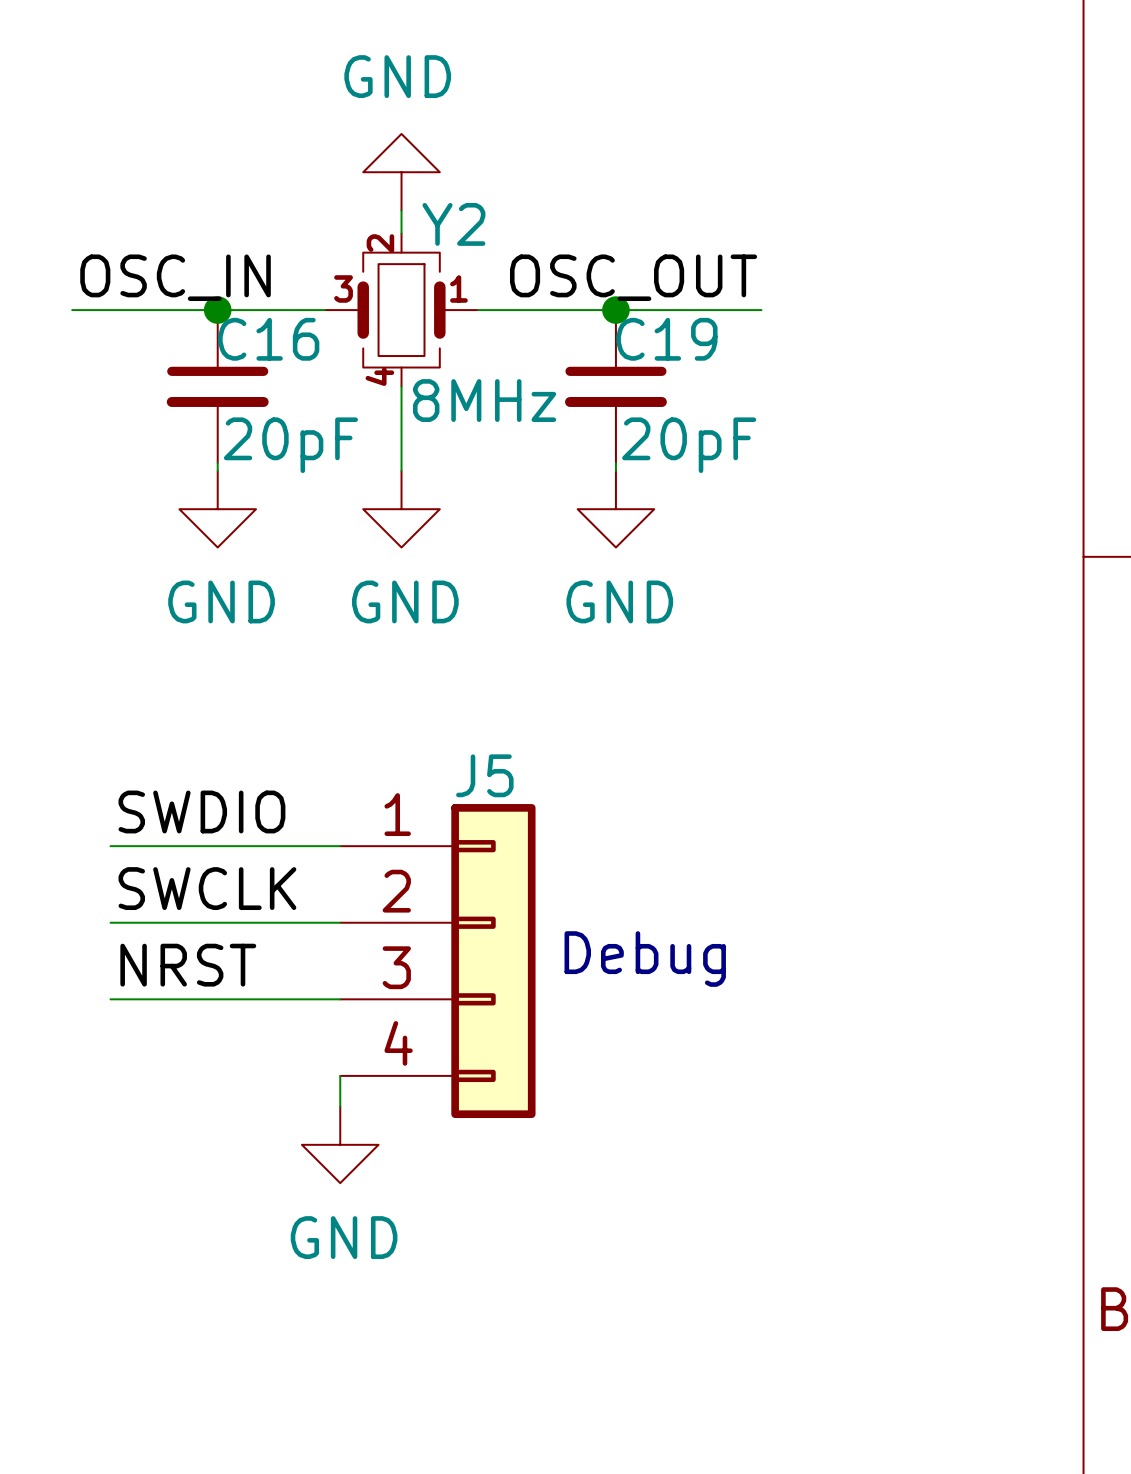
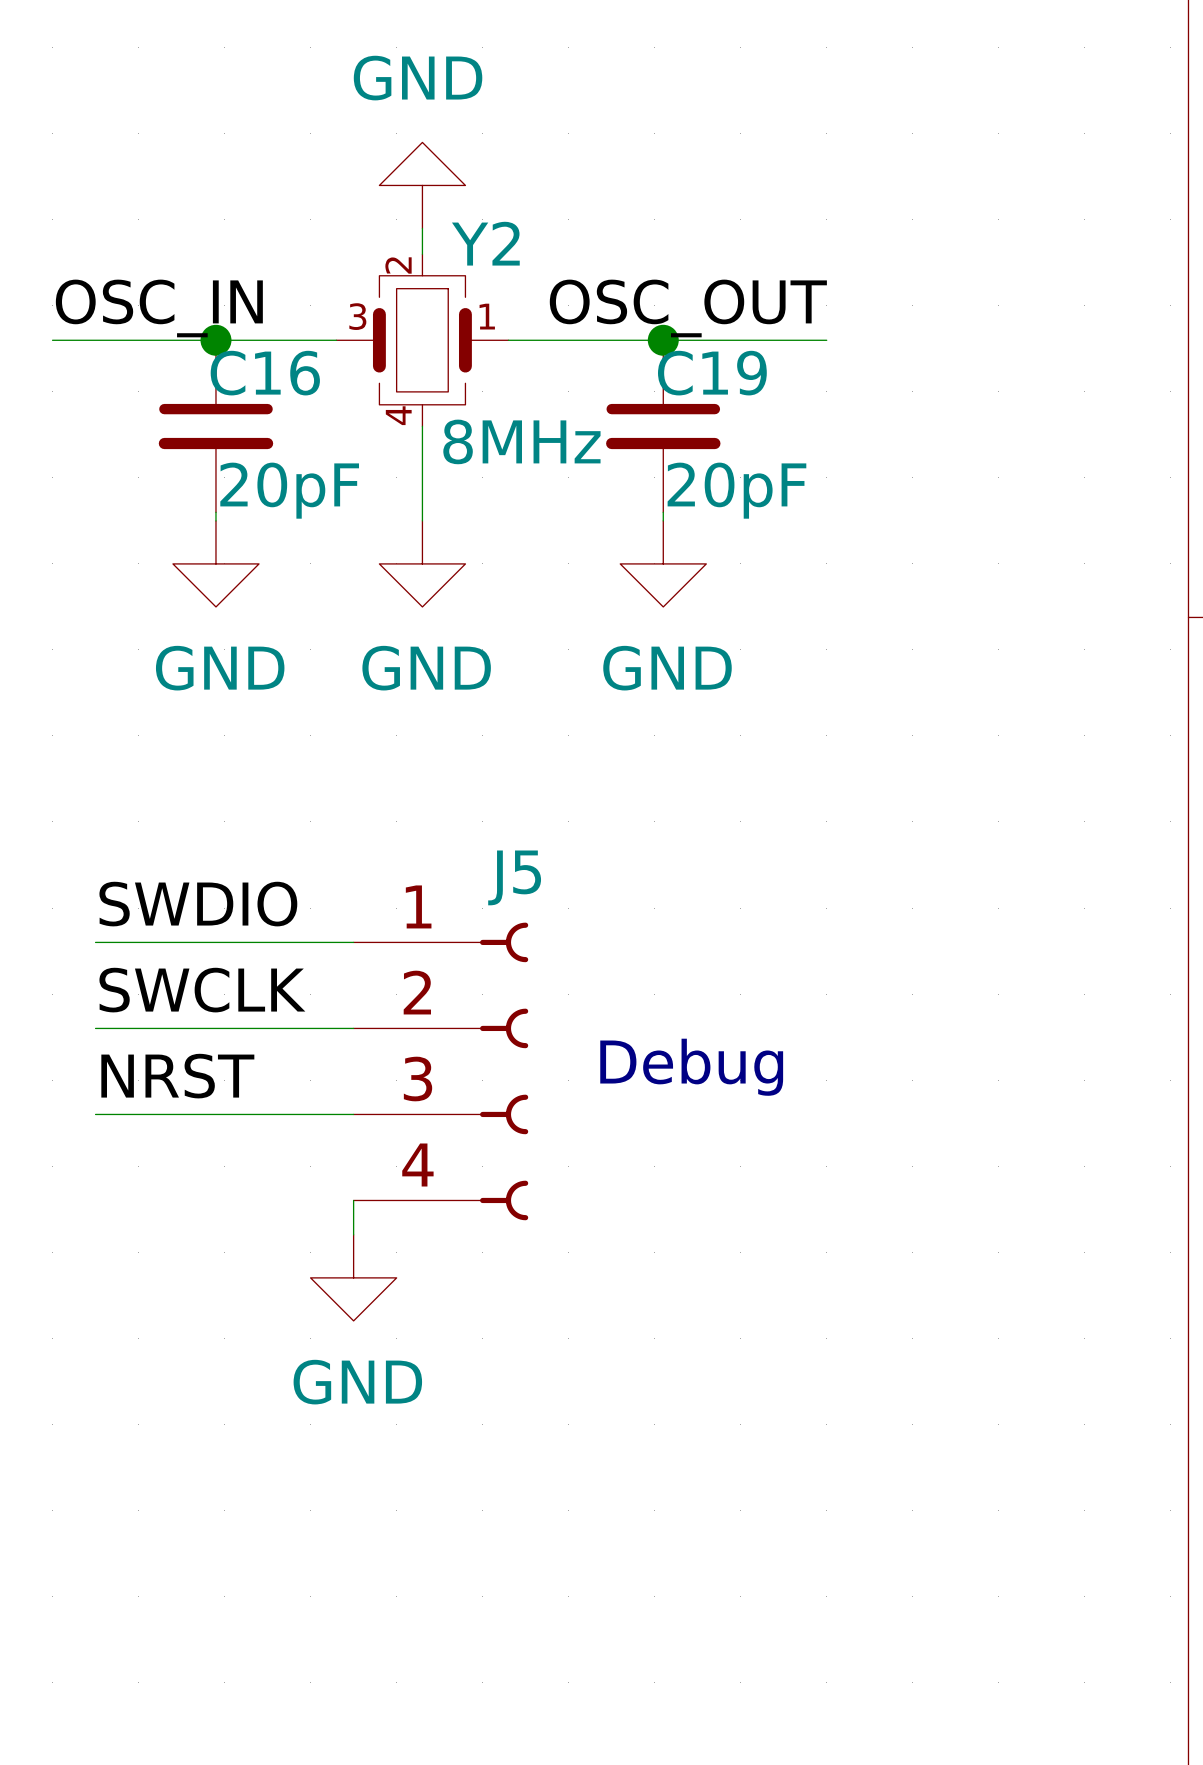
J5 symbol: [340, 804, 536, 1119] -> [353, 922, 529, 1221]

